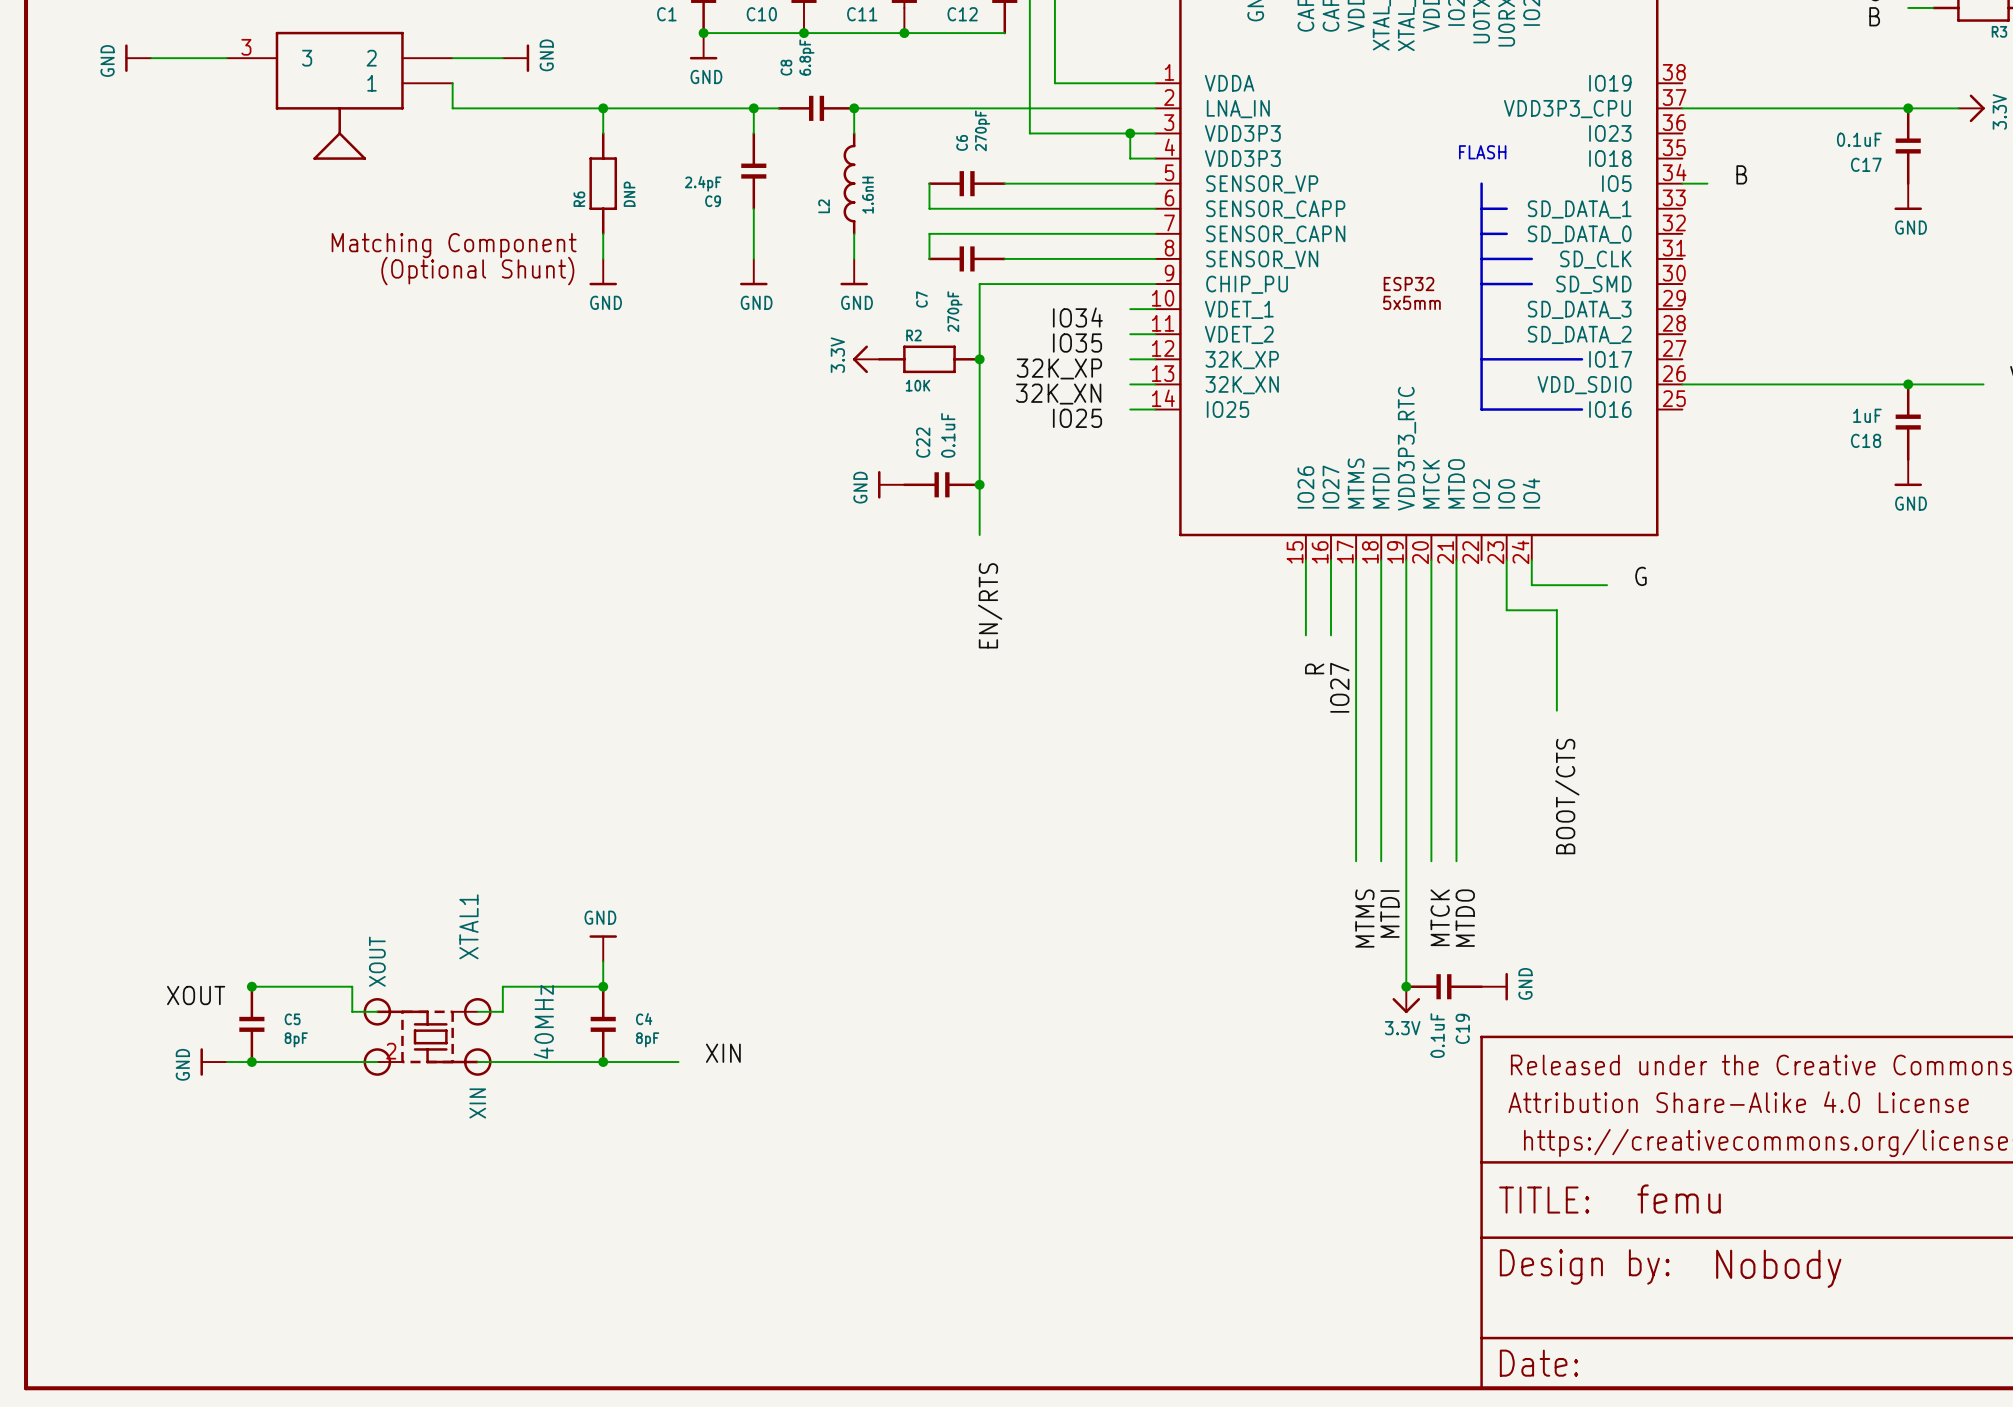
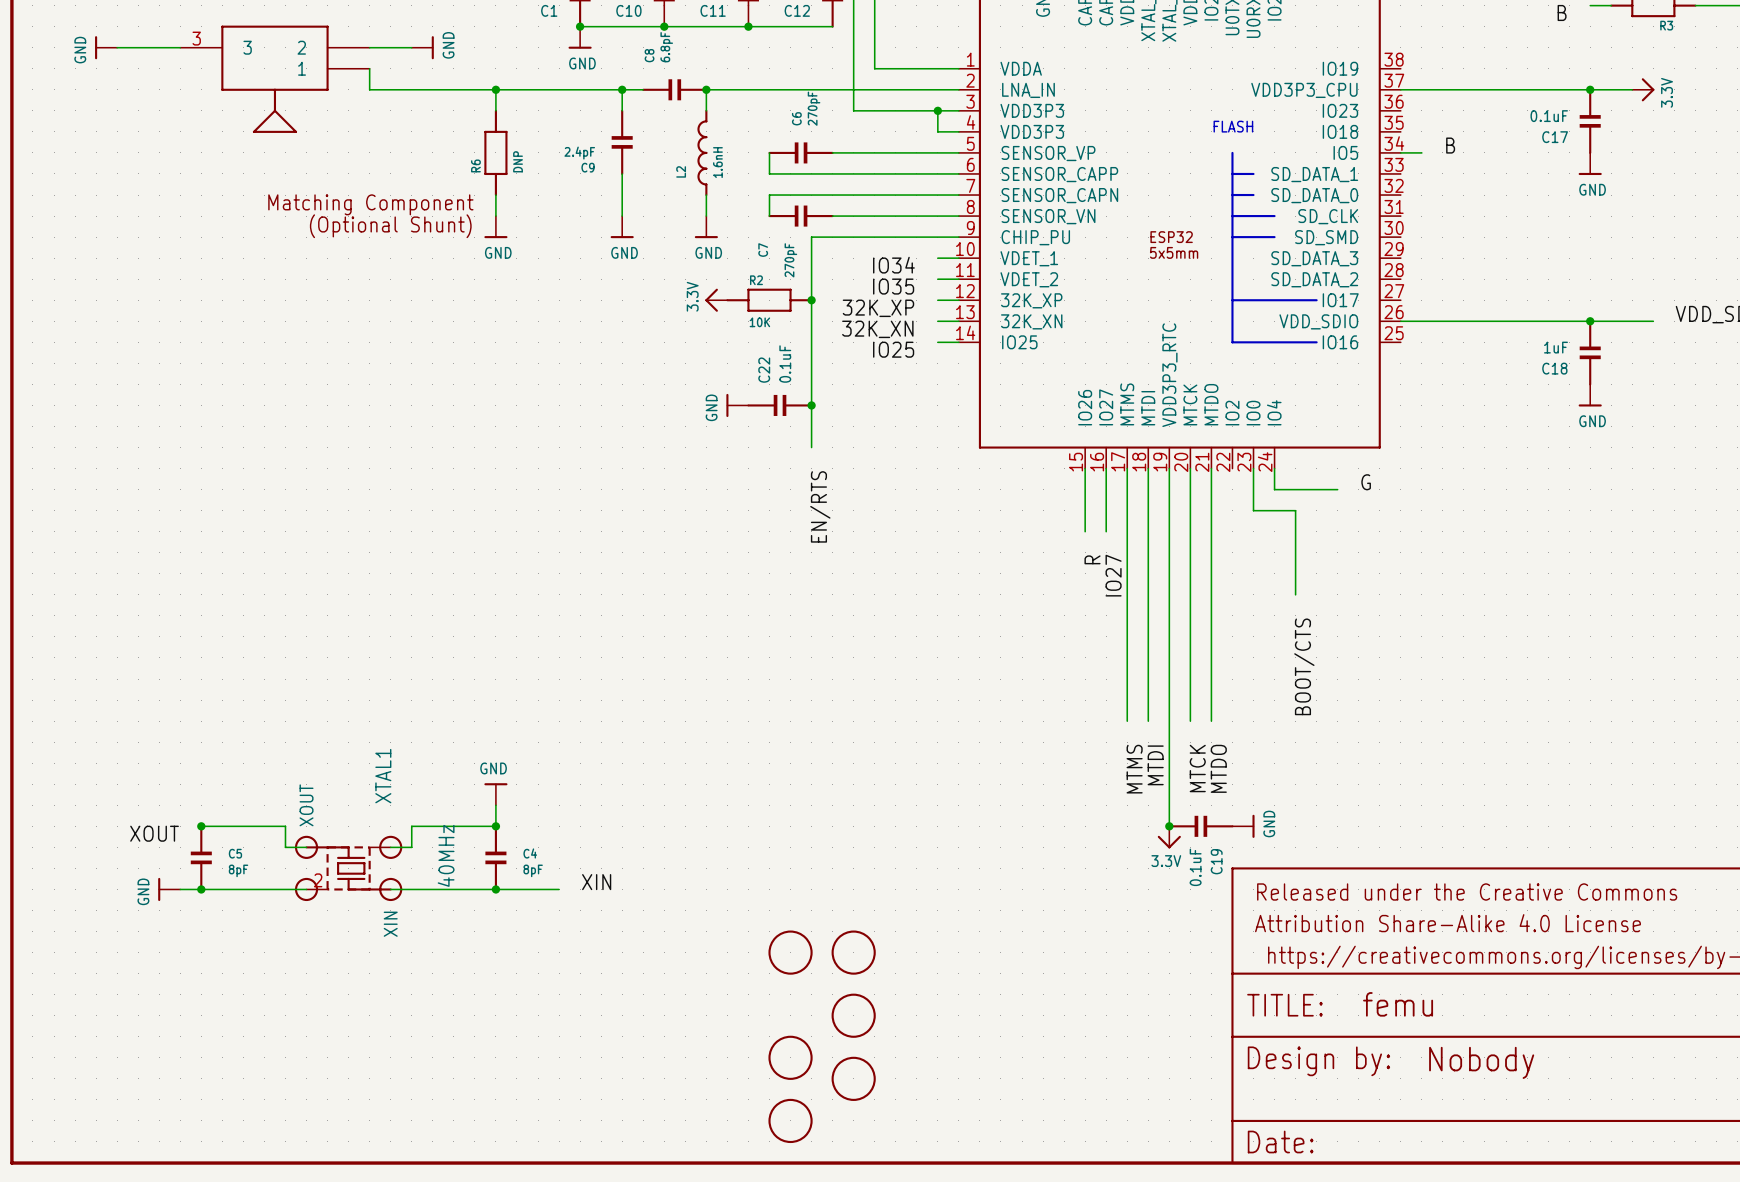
part: none -> (790, 952)
part: none -> (853, 952)
part: none -> (853, 1015)
part: none -> (790, 1057)
part: none -> (853, 1078)
part: none -> (790, 1120)

